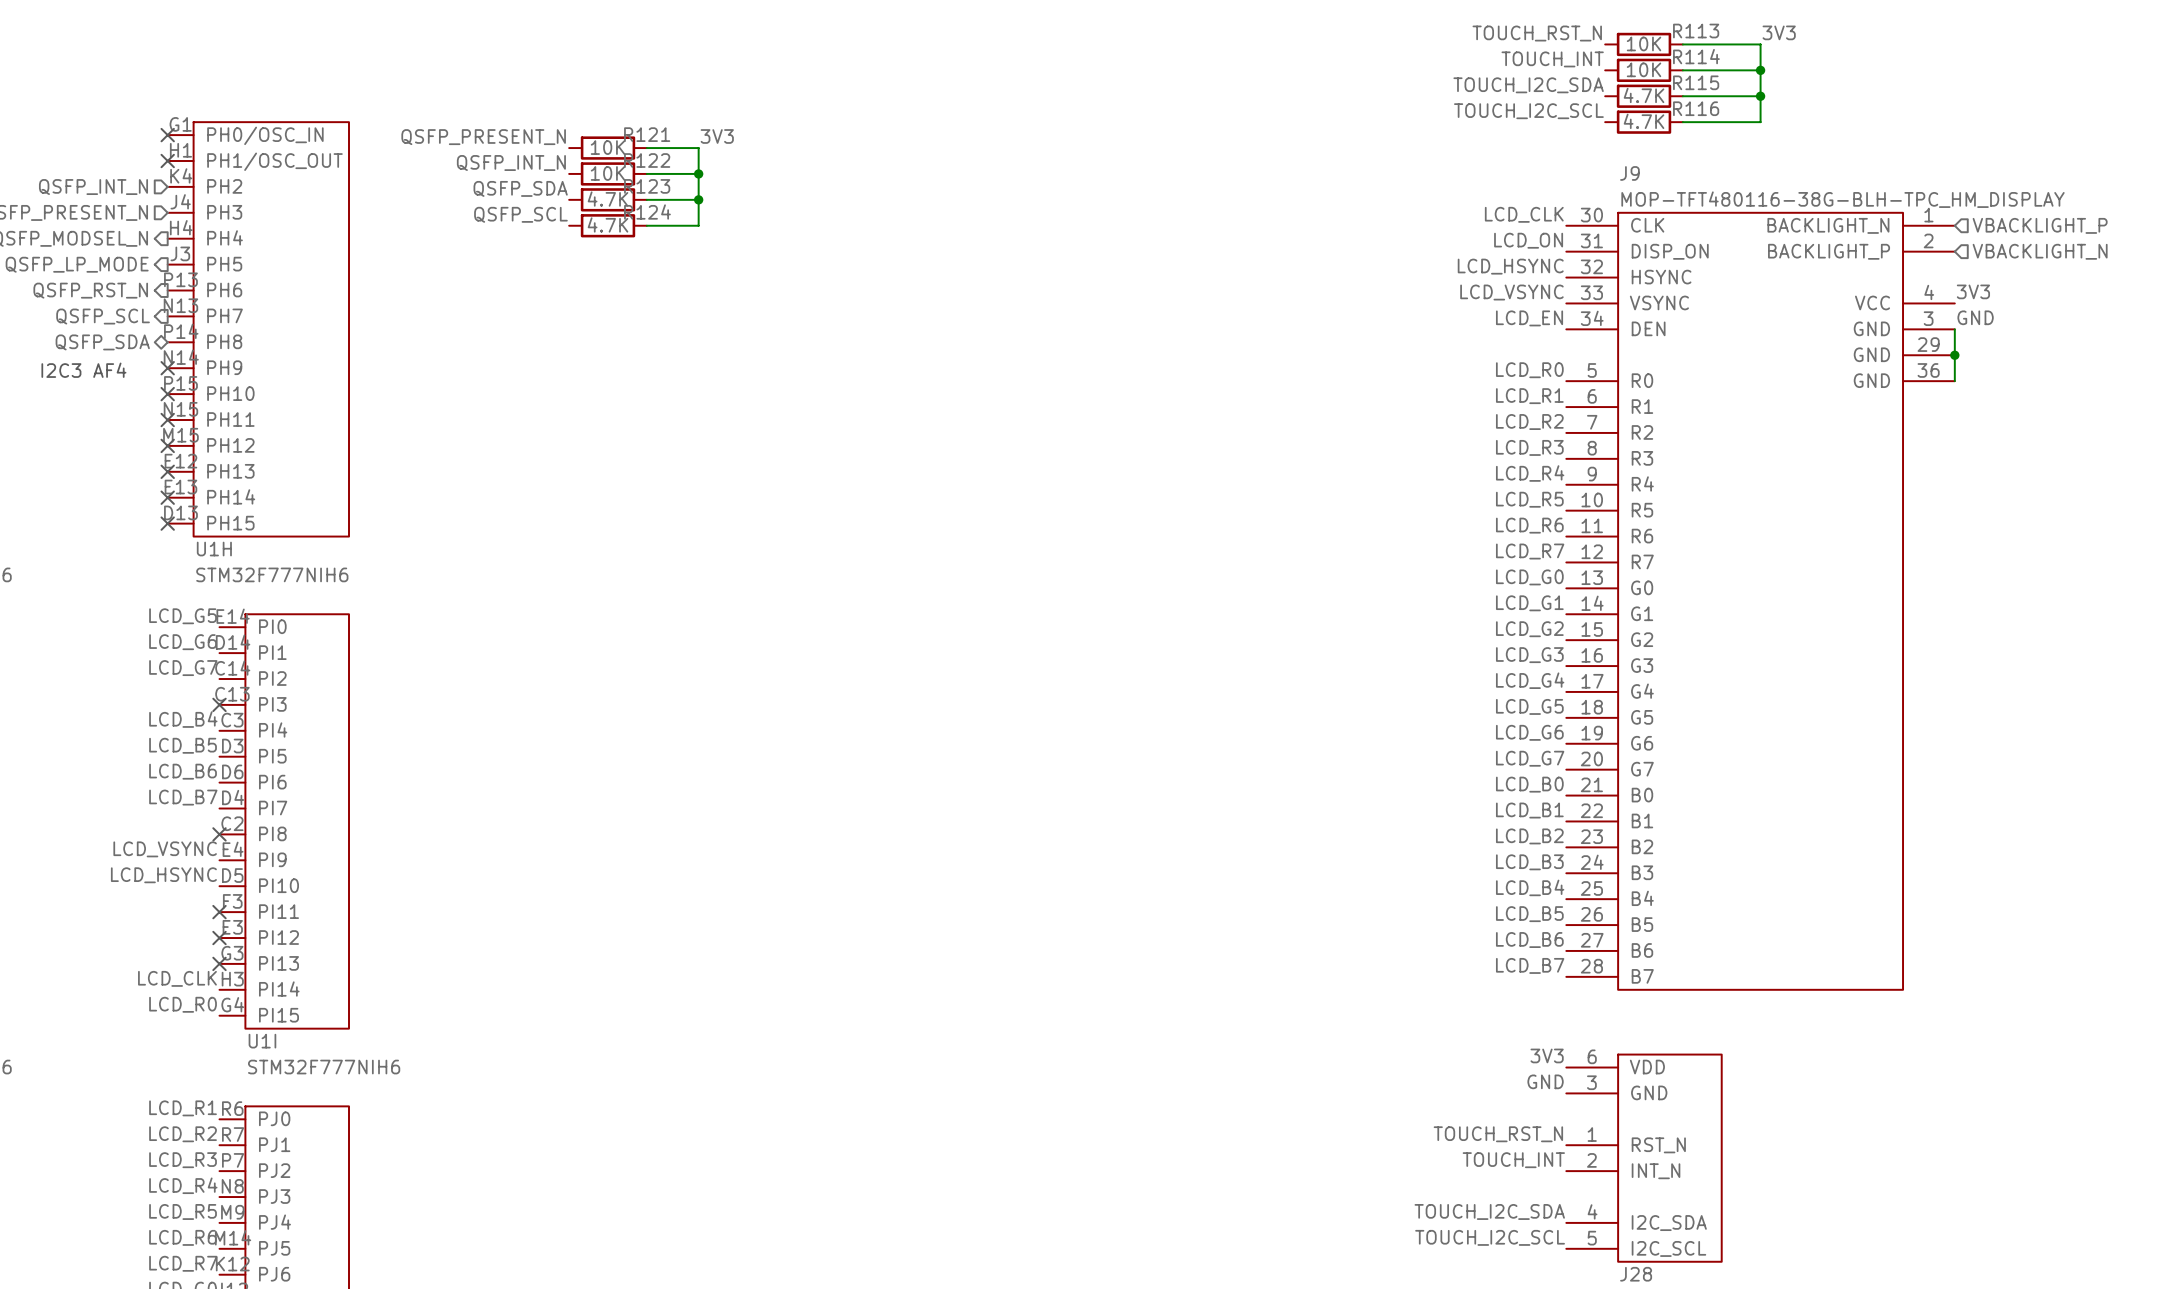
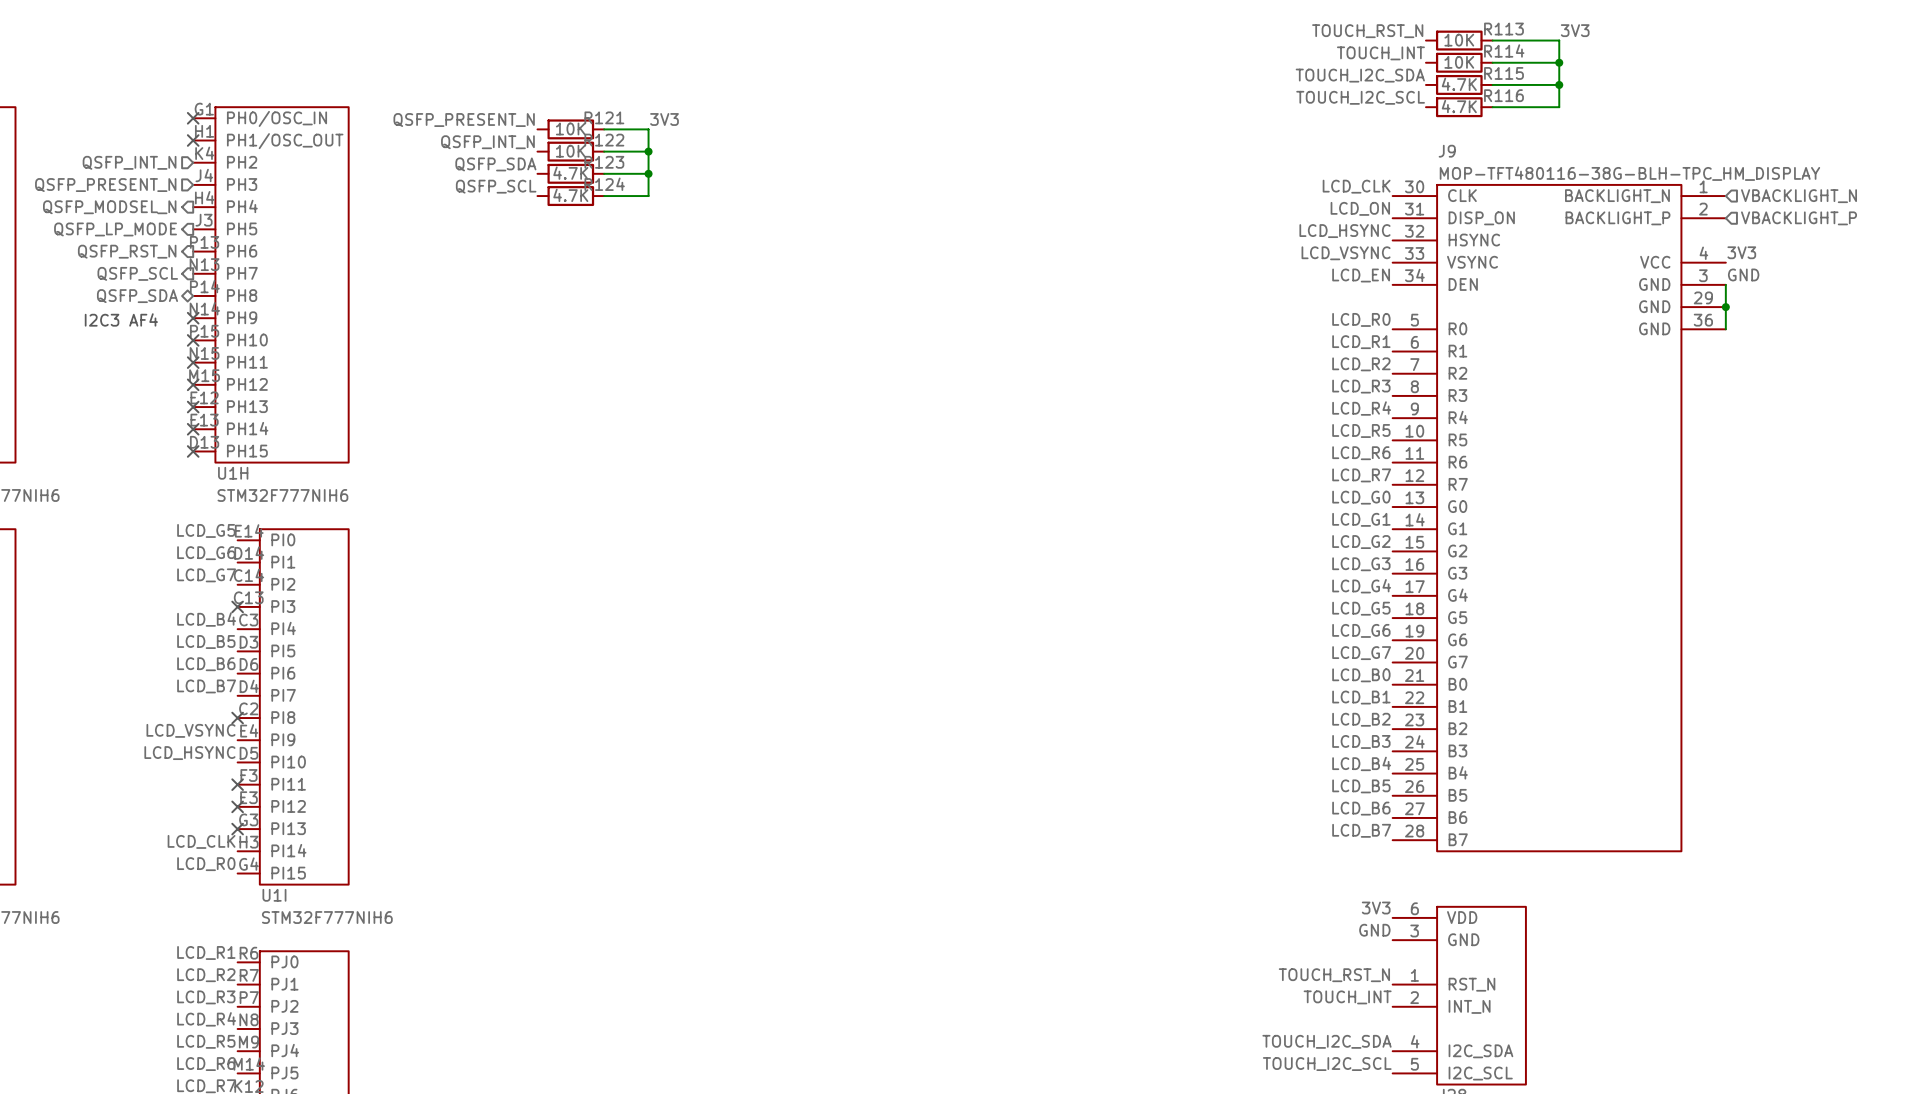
hierarchical label: VBACKLIGHT_P (2040, 225) -> VBACKLIGHT_N (1799, 196)
hierarchical label: VBACKLIGHT_N (2040, 251) -> VBACKLIGHT_P (1799, 218)

